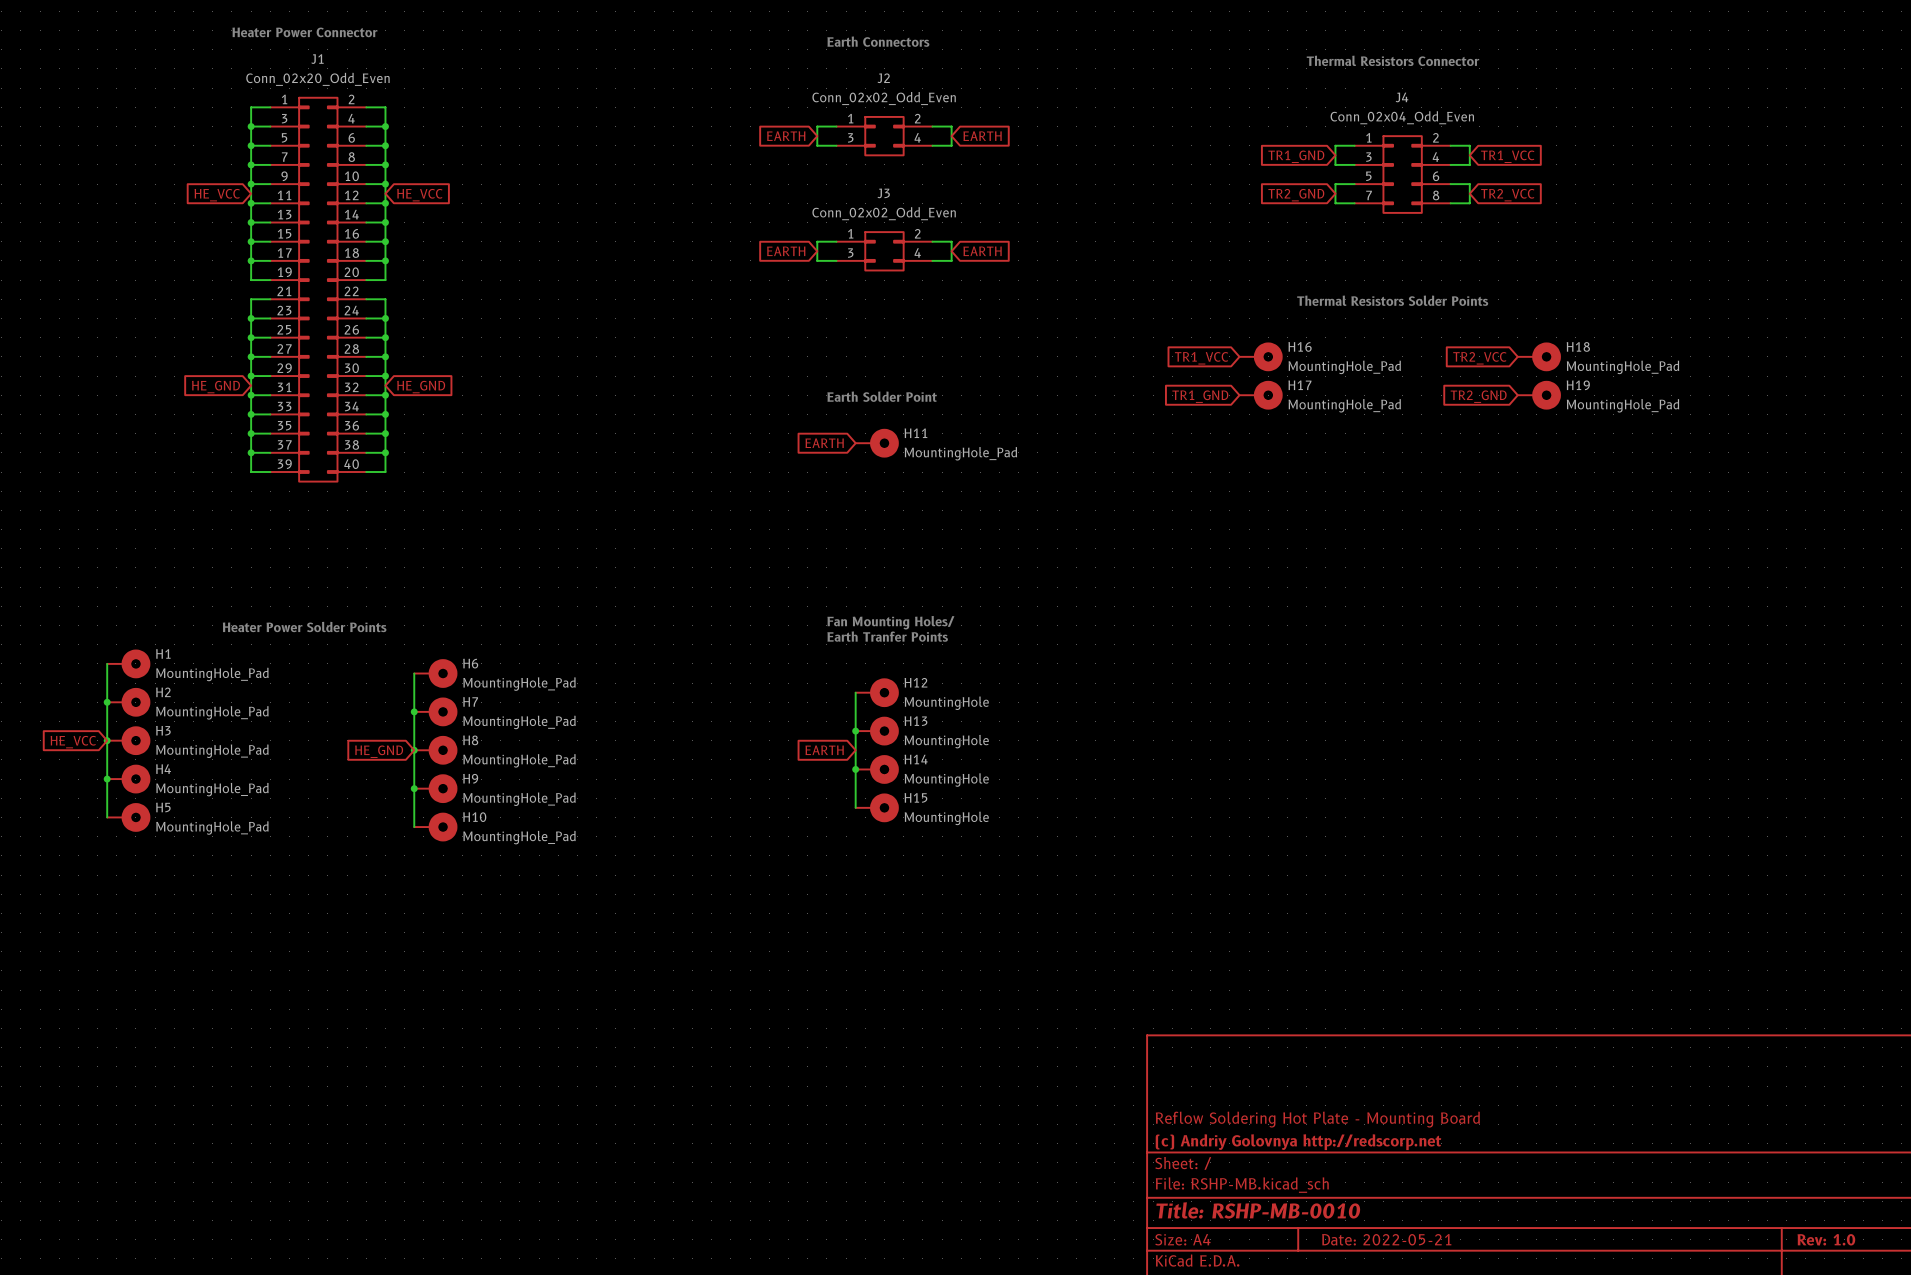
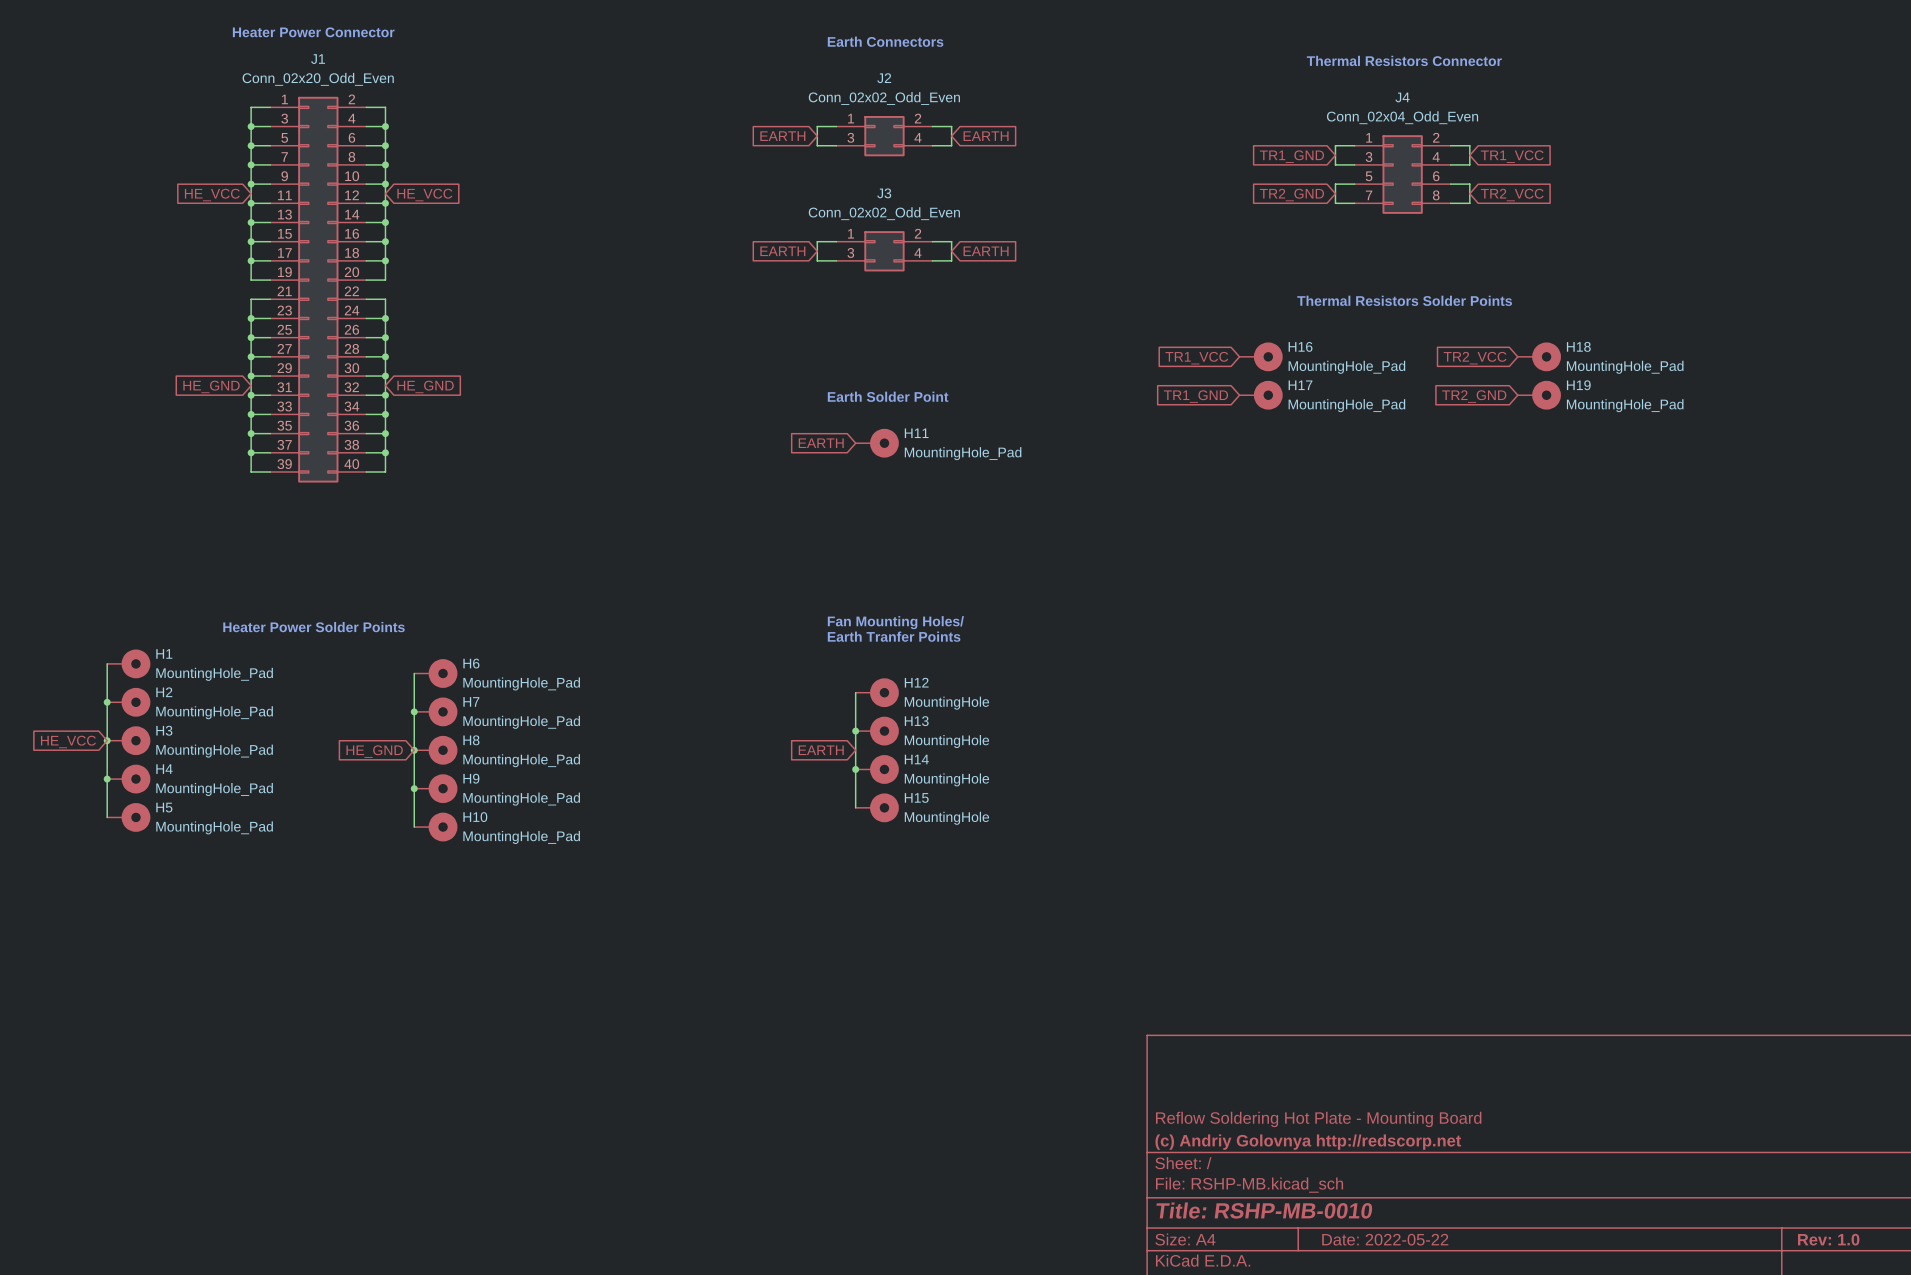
title block: Date: 2022-05-21 (1386, 1239) -> Date: 2022-05-22 (1385, 1239)

